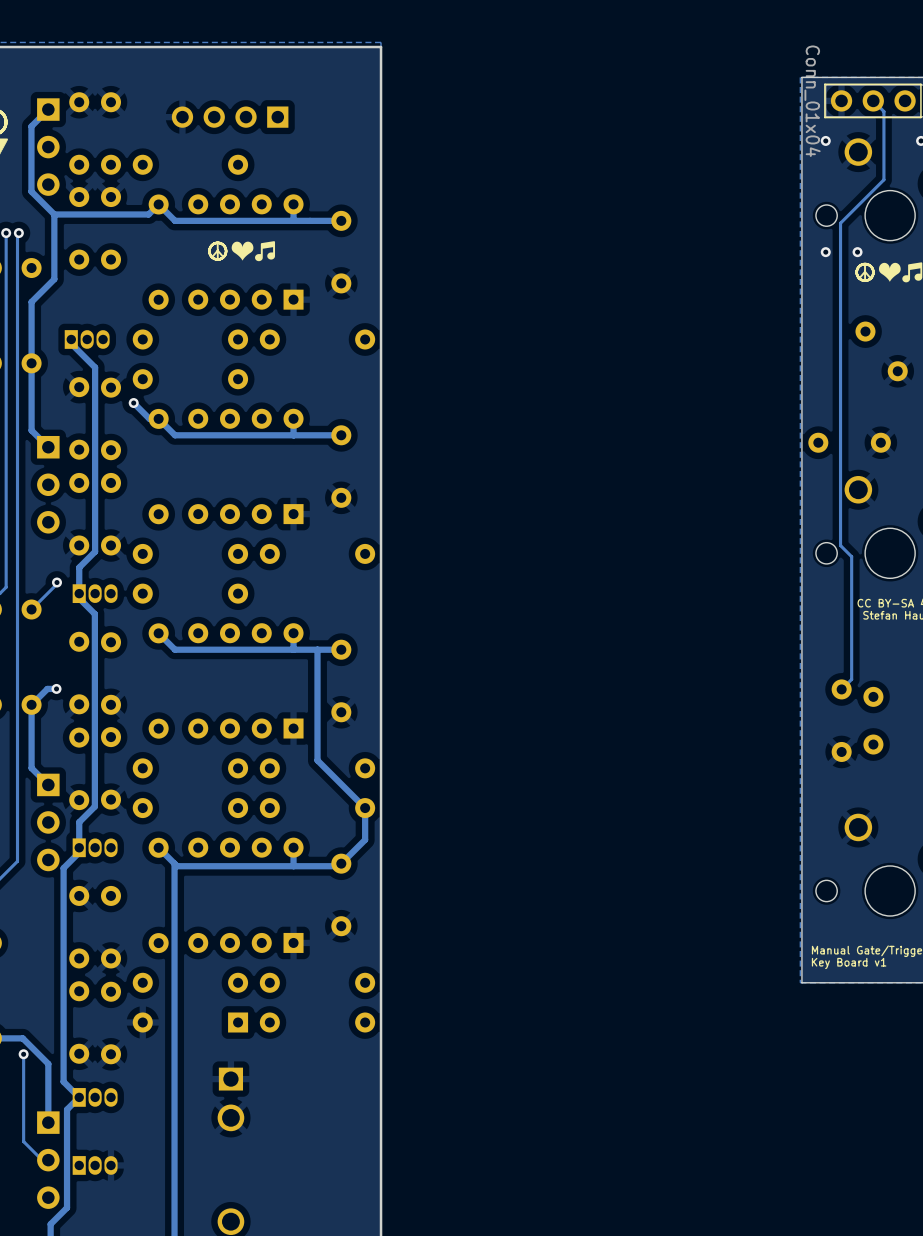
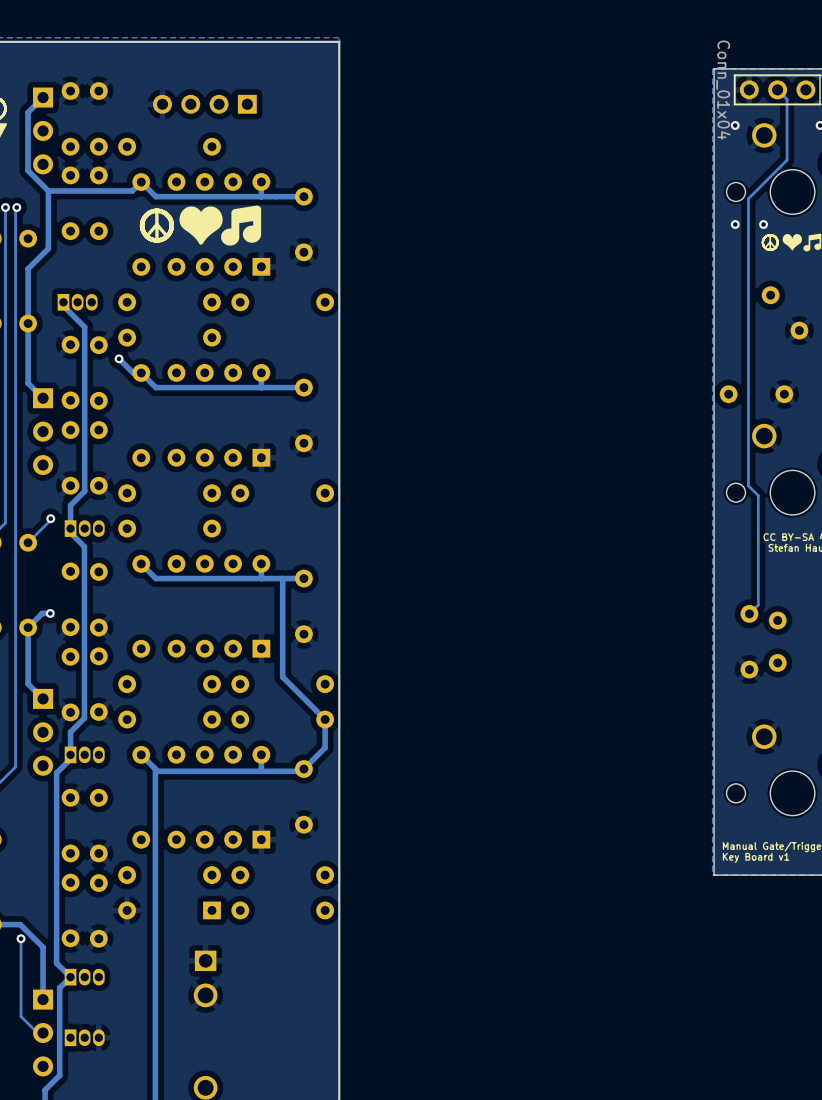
drawing: none -> [179, 206, 223, 245]
line: none -> (158, 210) (147, 214) (142, 224) (145, 235) (155, 240) (166, 237) (171, 227) (168, 216) (158, 210)
line: none -> (156, 212) (157, 239)
drawing: [231, 241, 254, 261] -> none
drawing shape: [255, 241, 276, 262] -> [221, 205, 262, 246]
line: (218, 242) (212, 244) (209, 250) (211, 256) (216, 259) (223, 257) (226, 252) (224, 245) (218, 242) -> none
line: (217, 243) (217, 258) -> none
line: (217, 250) (212, 256) -> none
line: (217, 250) (223, 256) -> none
line: none -> (157, 224) (147, 235)
line: none -> (156, 224) (166, 235)

